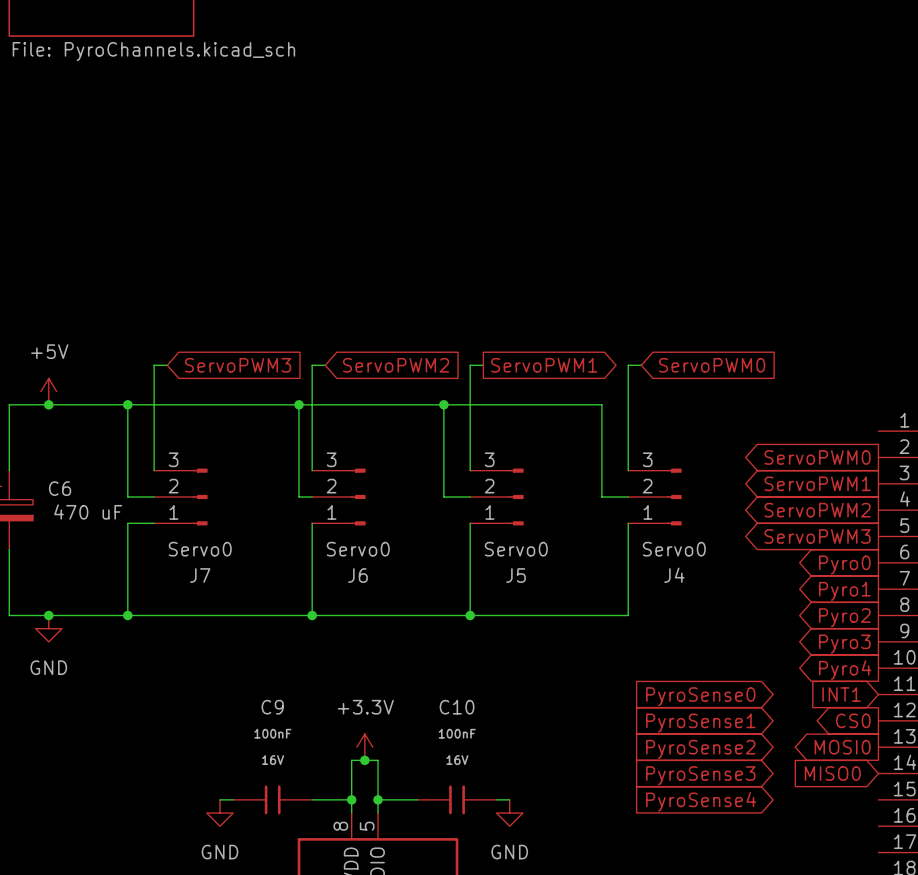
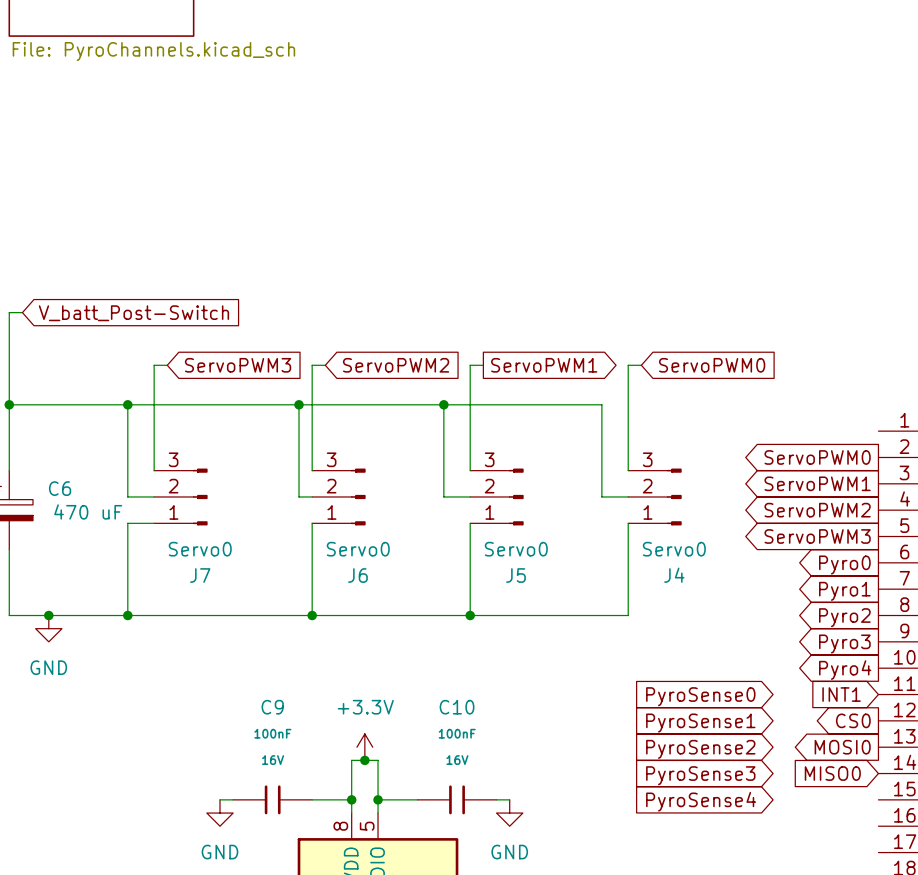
wire: none -> (22, 312) (9, 312) (9, 404)
global label: none -> V_batt_Post-Switch (133, 313)
power symbol: +5V (48, 391) -> none
junction position: (48, 404) -> (9, 404)

